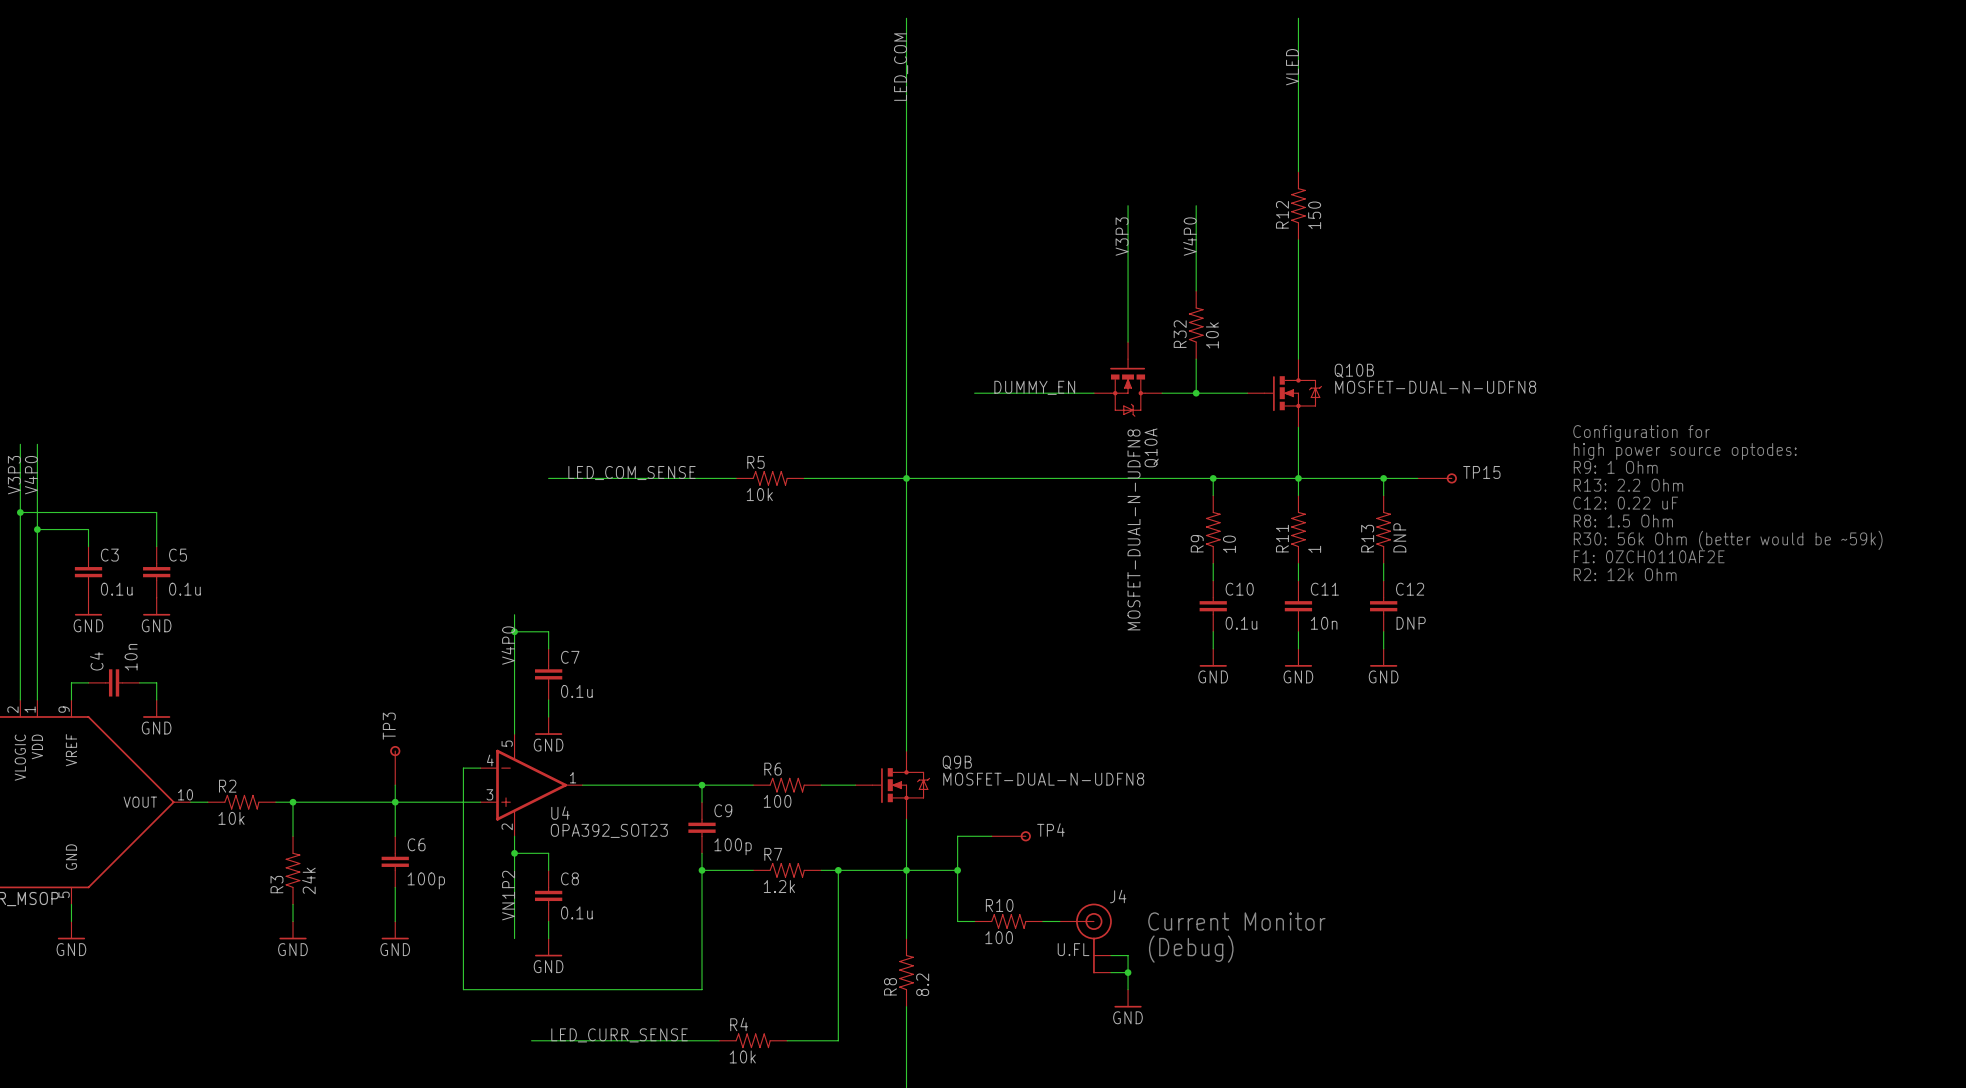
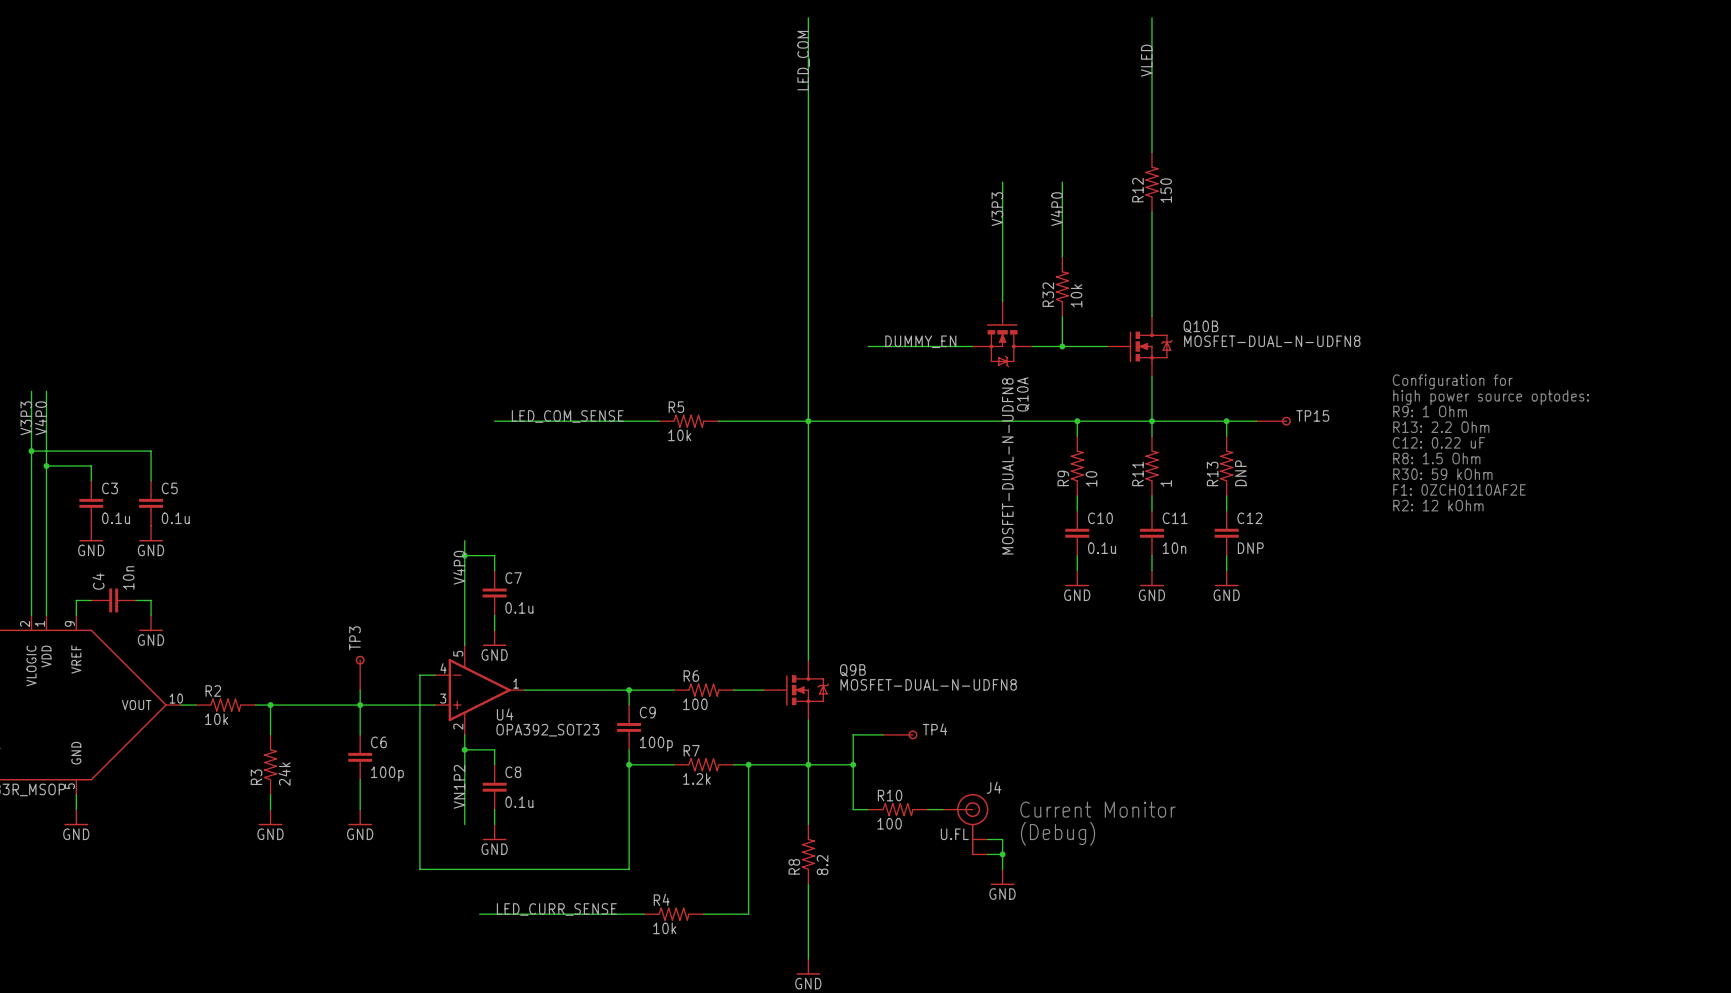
text: R30: 56k Ohm (better would be ~59k) (1728, 540) -> R30: 59 kOhm (1442, 474)
text: R2: 12k Ohm (1625, 574) -> R2: 12 kOhm (1438, 505)

